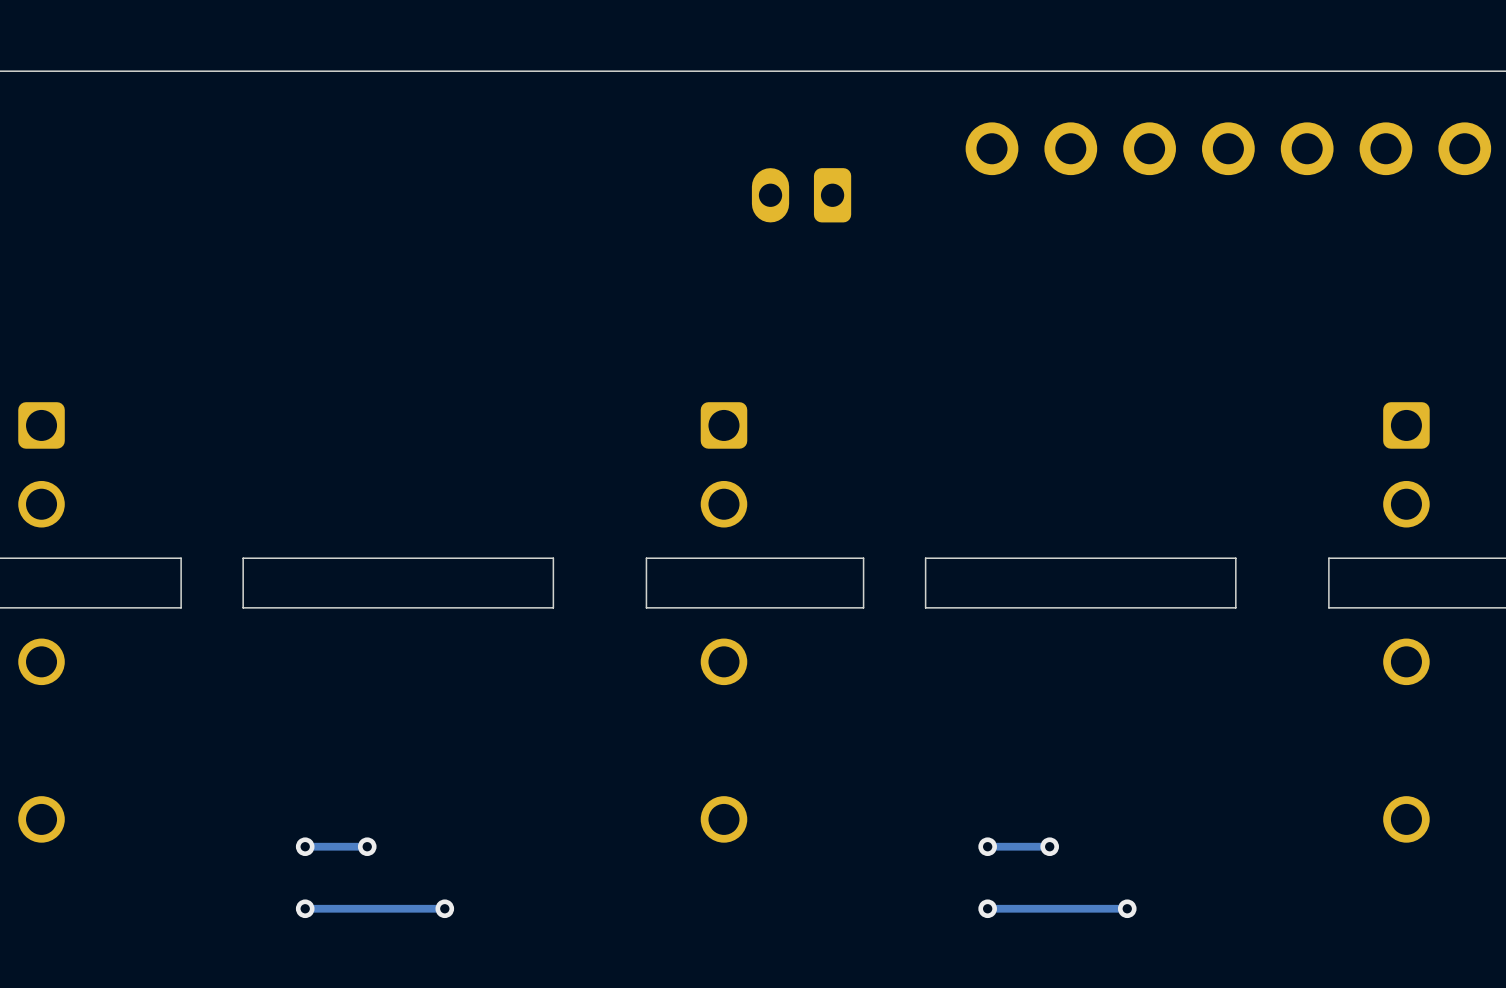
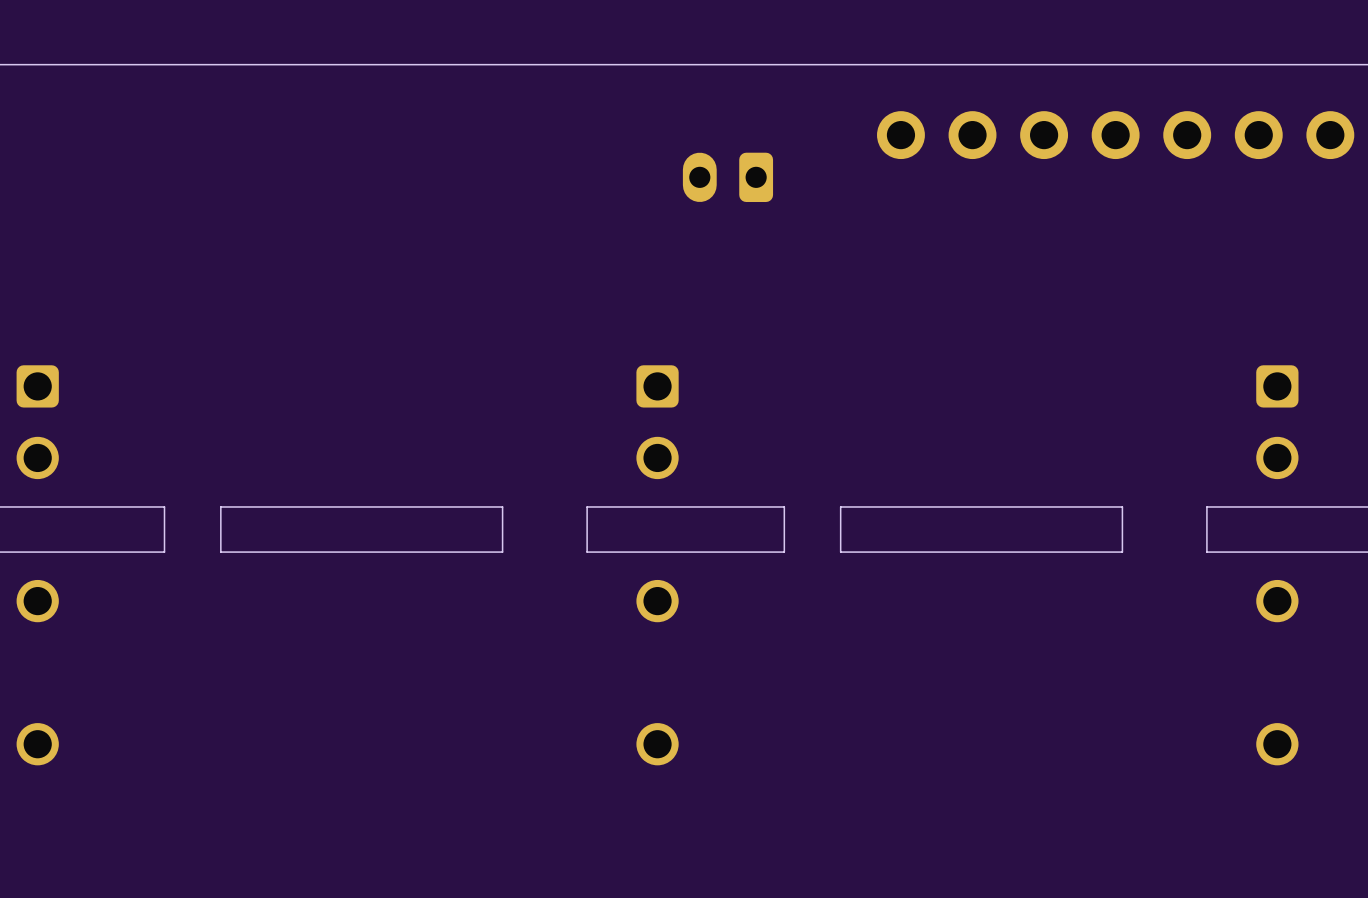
via: (305, 846) -> none
track: (367, 846) (305, 846) -> none
via: (367, 846) -> none
via: (987, 846) -> none
track: (1049, 846) (987, 846) -> none
via: (1049, 846) -> none
via: (305, 908) -> none
track: (444, 908) (305, 908) -> none
via: (444, 908) -> none
via: (987, 908) -> none
track: (1127, 908) (987, 908) -> none
via: (1127, 908) -> none

